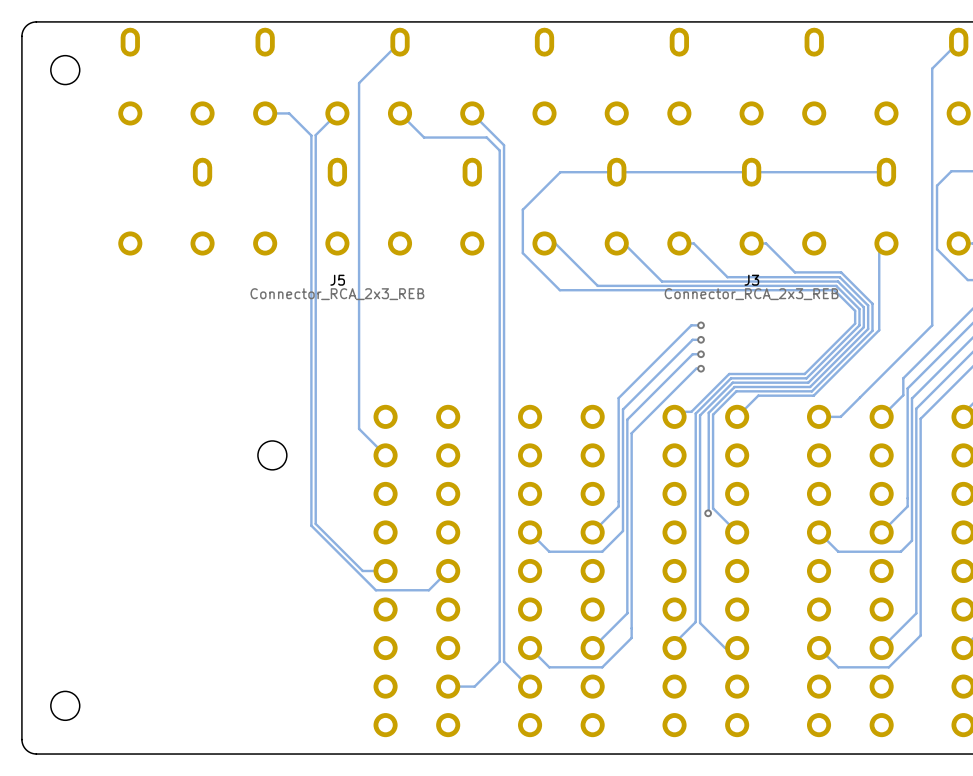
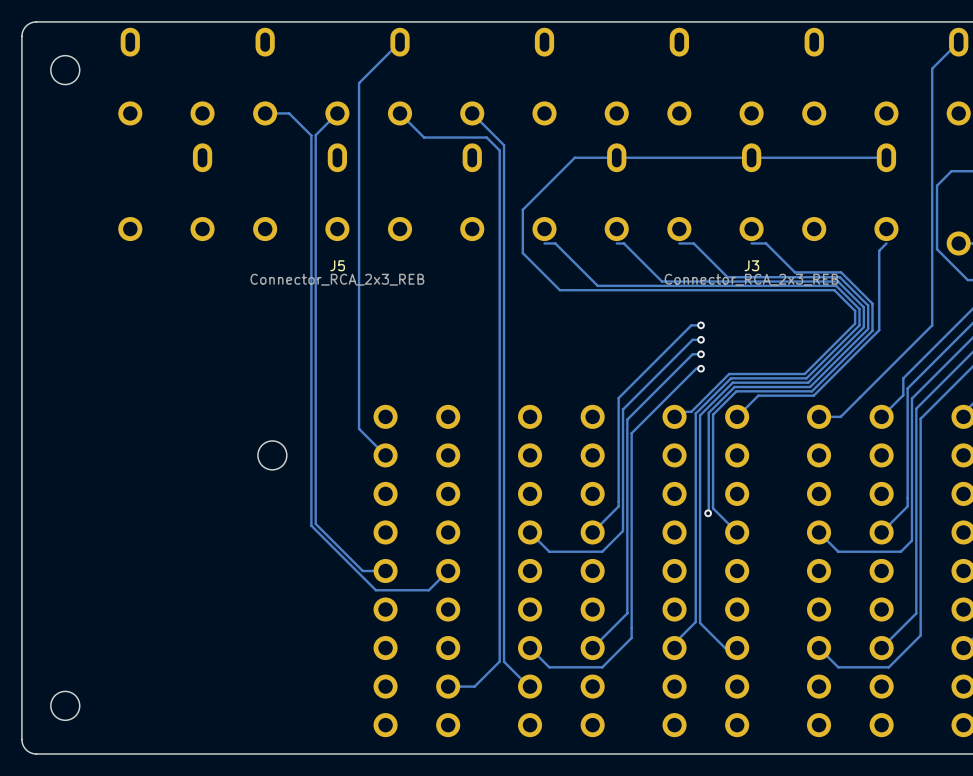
track: (886, 172) (560, 172) -> (886, 157) (574, 157) (560, 172)
J5 position: (301, 206) -> (301, 192)
J3 position: (715, 206) -> (715, 192)

